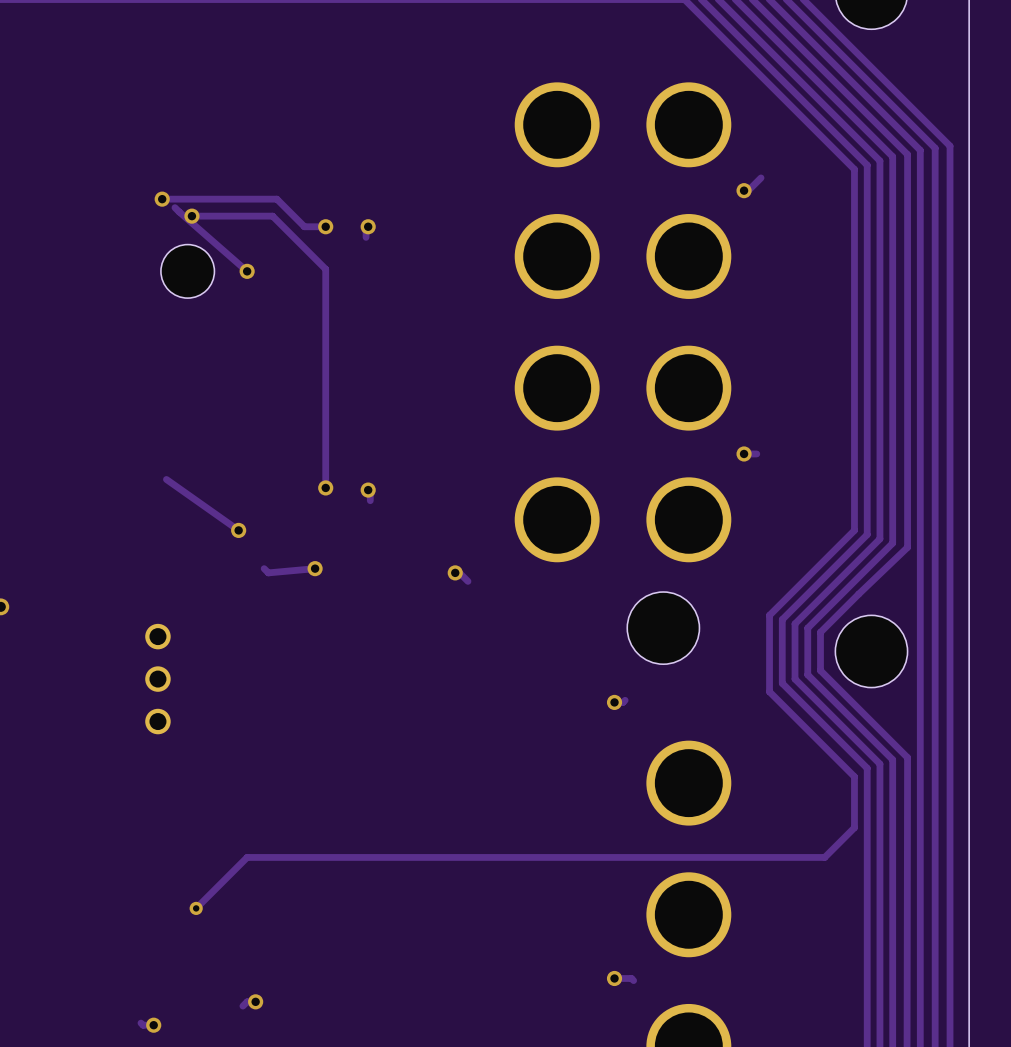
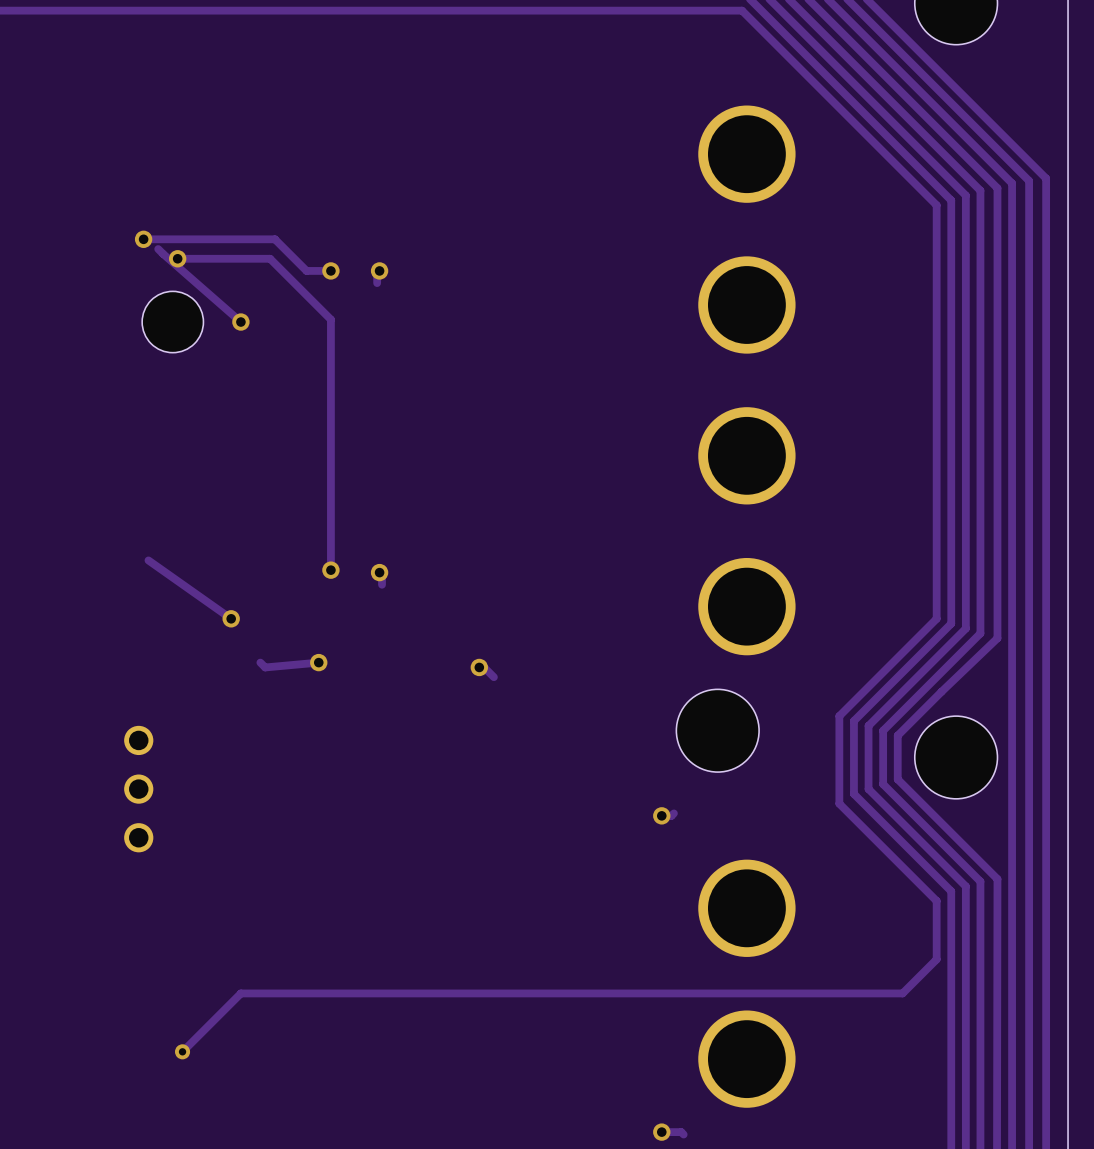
part: (557, 124) -> none
track: (761, 177) (748, 190) (744, 190) -> none
via: (744, 190) -> none
part: (557, 256) -> none
part: (557, 388) -> none
via: (744, 453) -> none
track: (756, 453) (744, 453) -> none
part: (557, 519) -> none

